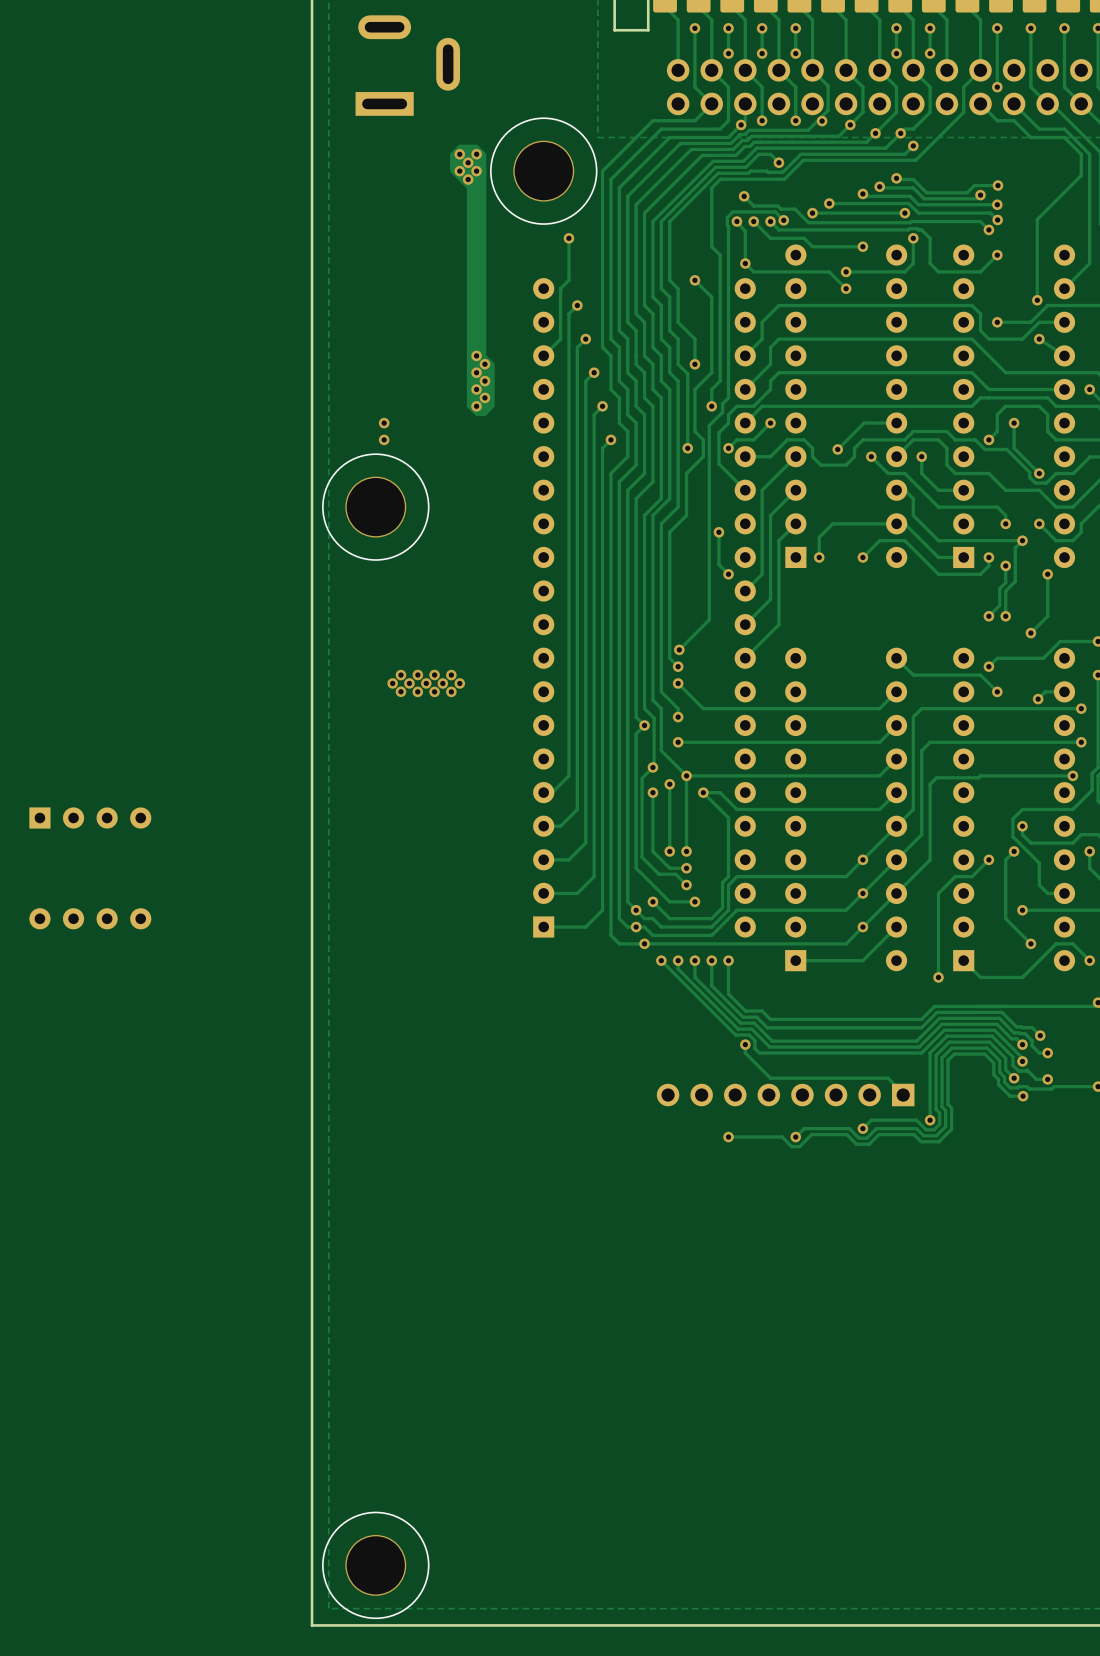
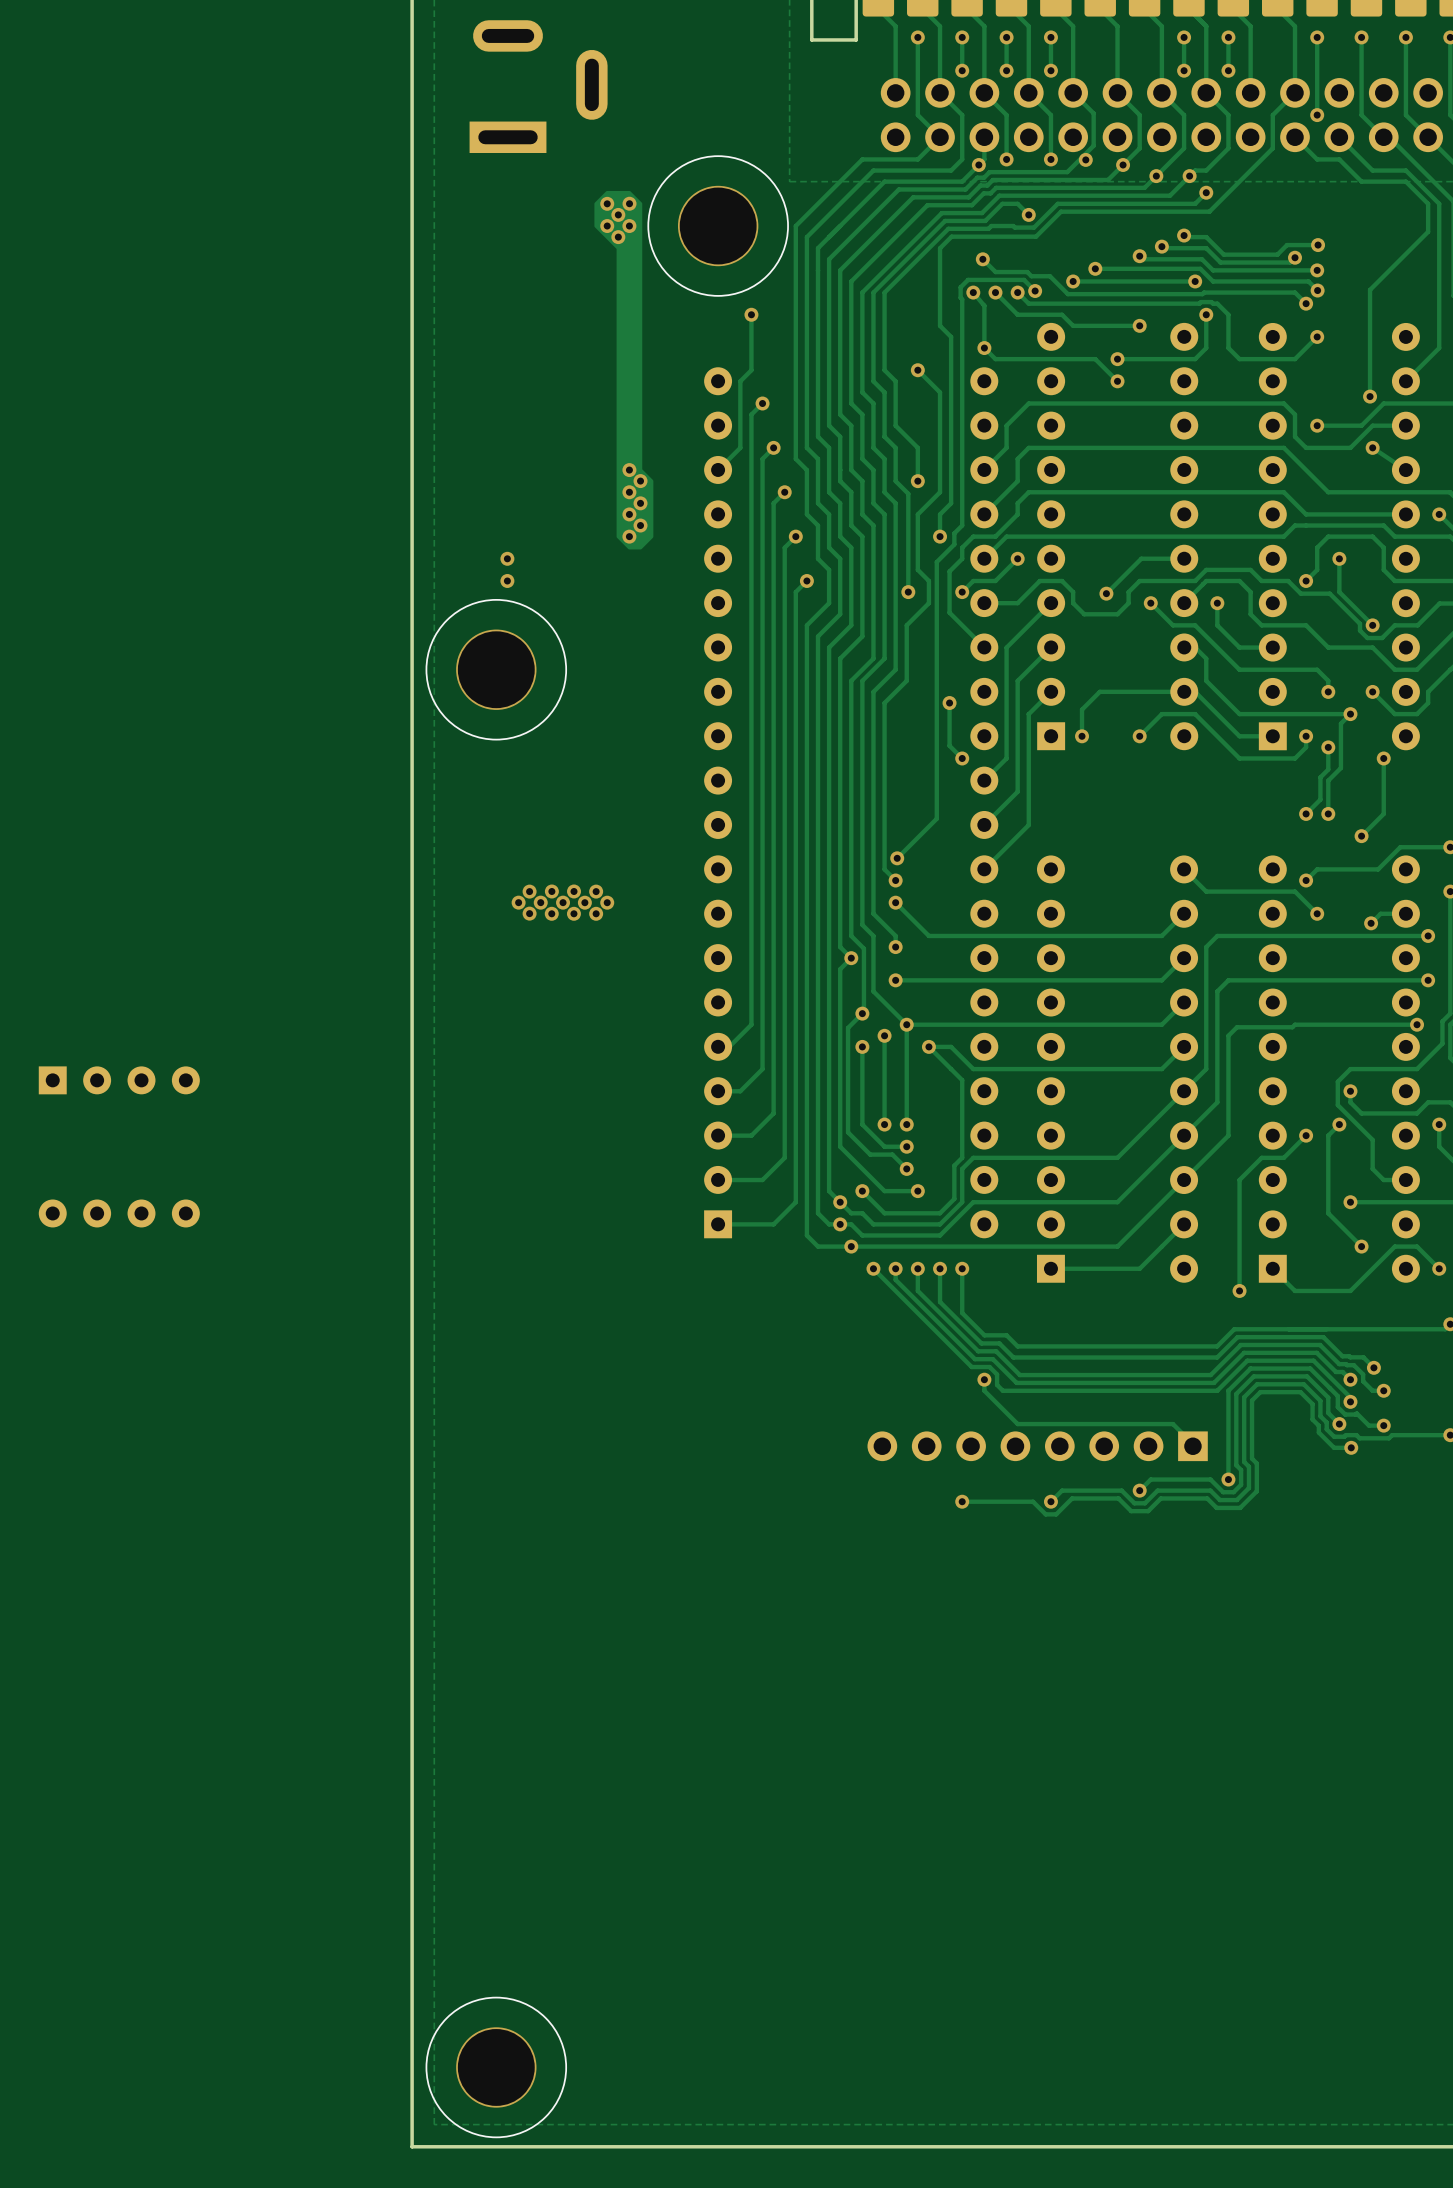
via: (862, 859) -> none
via: (862, 893) -> none
via: (862, 927) -> none

